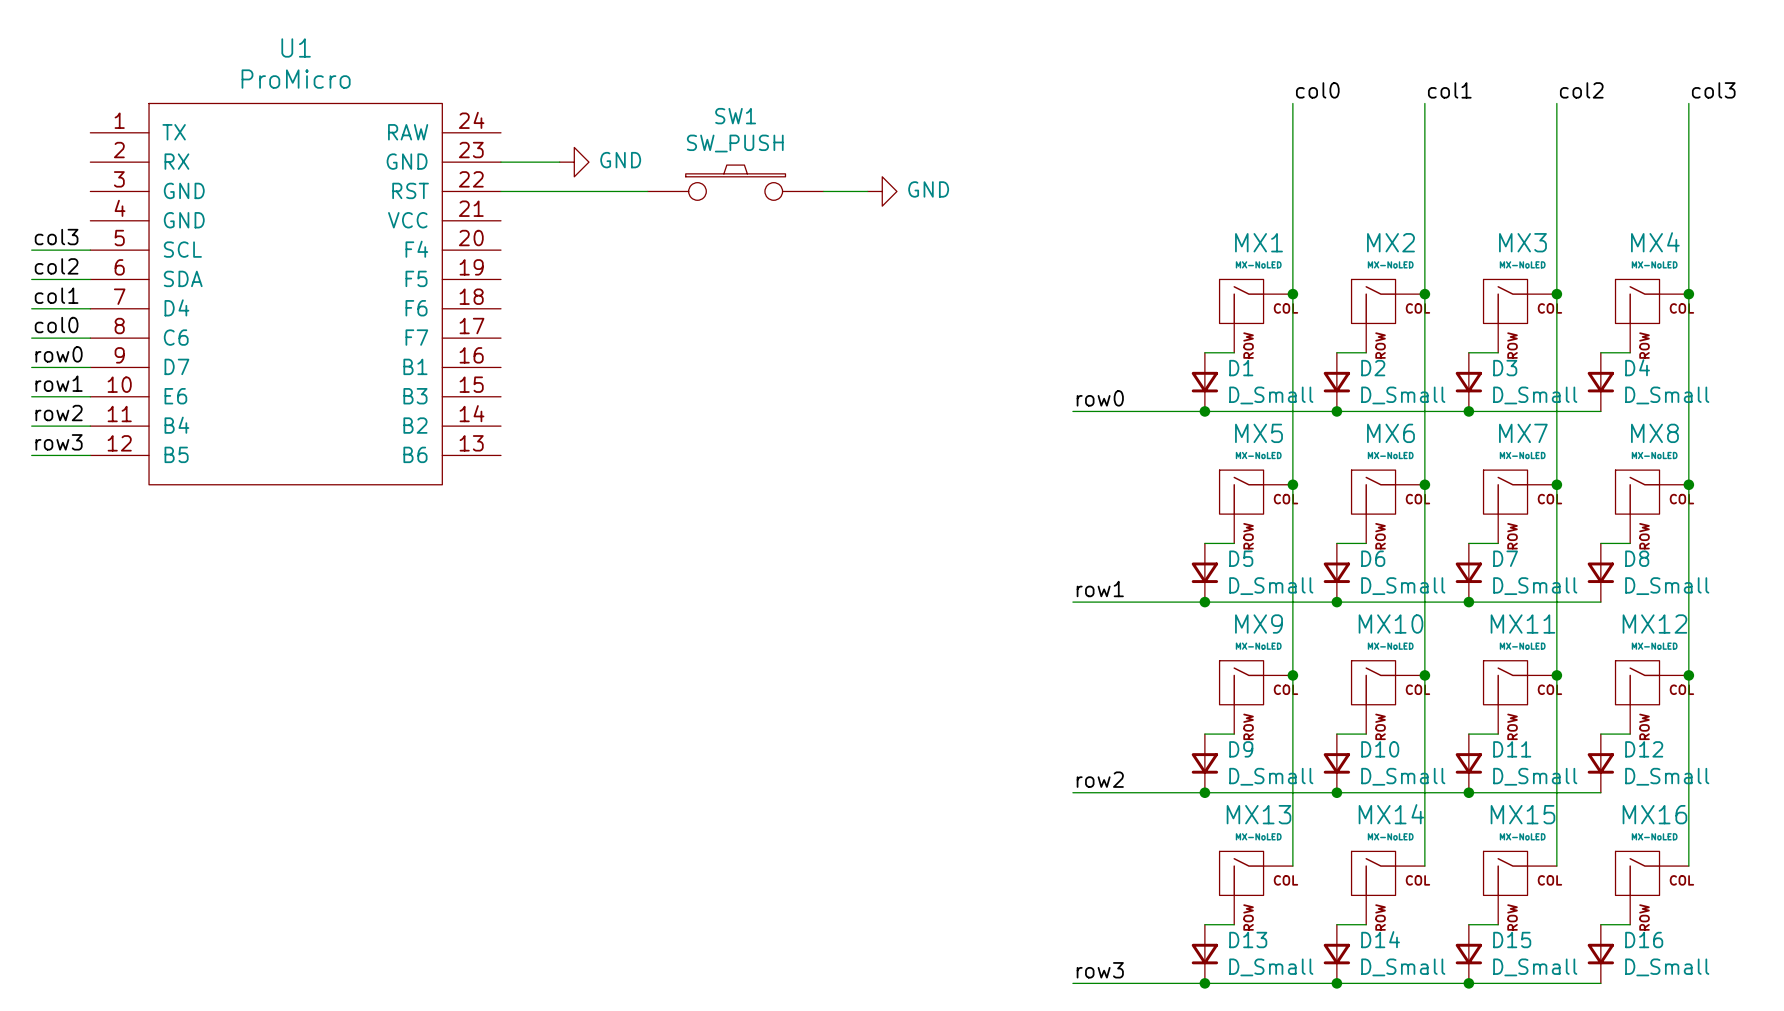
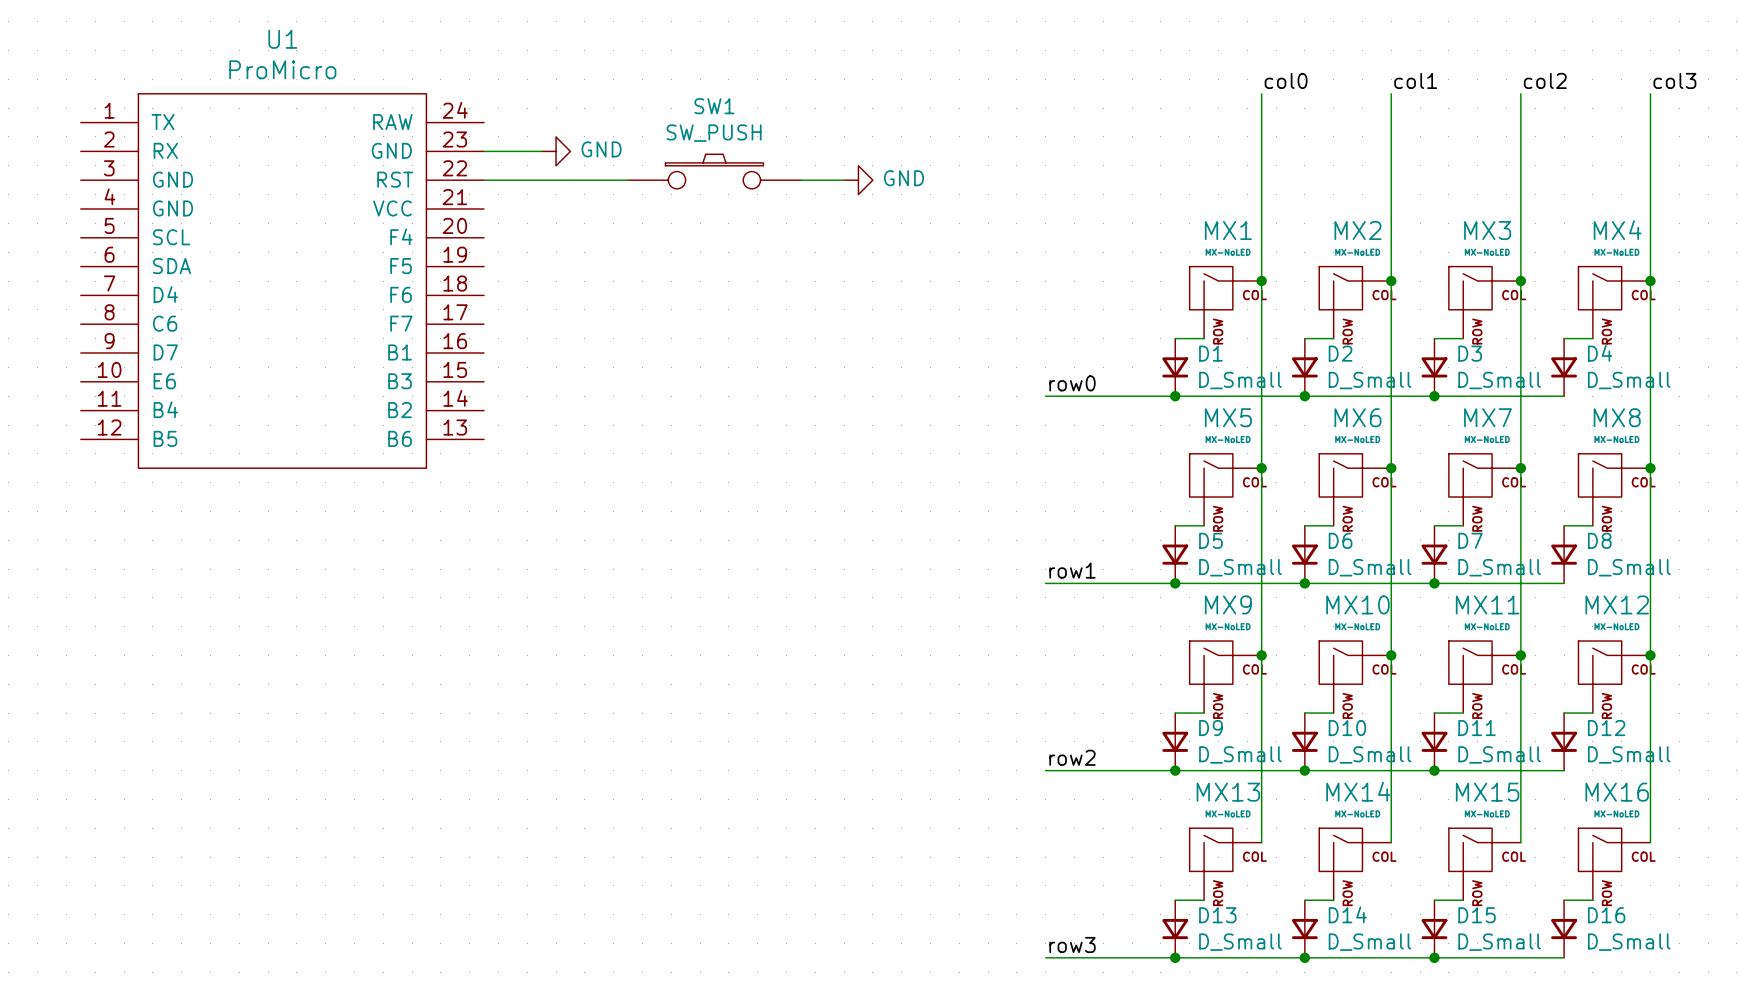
label: col3 (56, 237) -> none
wire: (31, 250) (90, 250) -> none
label: col2 (56, 266) -> none
wire: (31, 279) (90, 279) -> none
label: col1 (56, 295) -> none
wire: (31, 308) (90, 308) -> none
label: col0 (56, 325) -> none
wire: (31, 338) (90, 338) -> none
label: row0 (59, 354) -> none
wire: (31, 367) (90, 367) -> none
label: row1 (59, 383) -> none
wire: (31, 396) (90, 396) -> none
label: row2 (59, 413) -> none
wire: (31, 426) (90, 426) -> none
label: row3 (59, 442) -> none
wire: (31, 455) (90, 455) -> none

